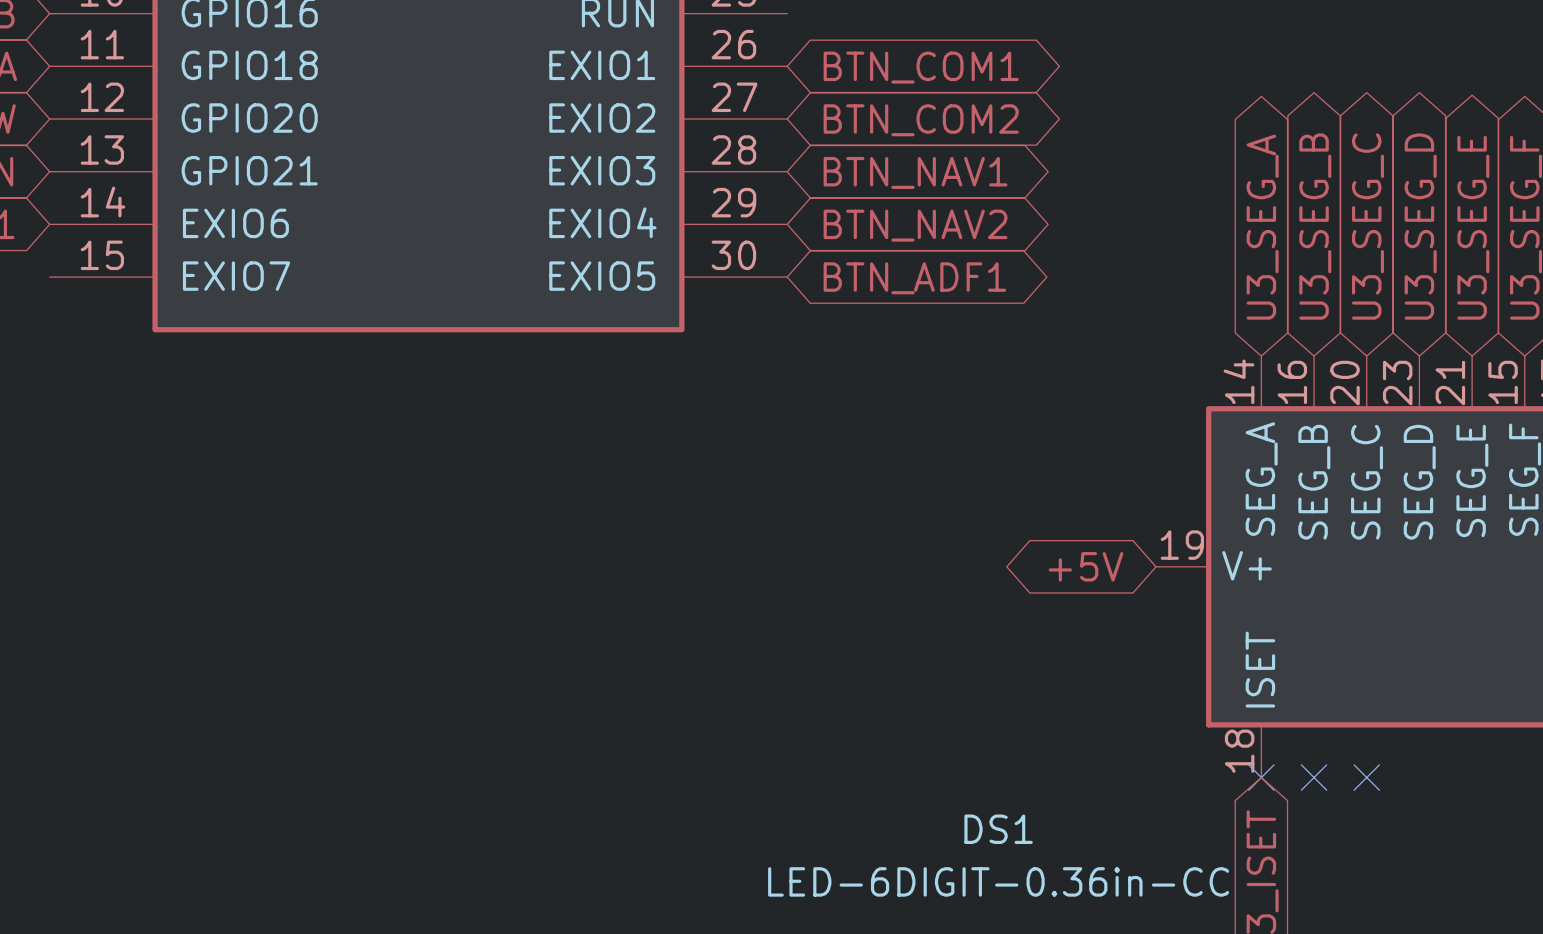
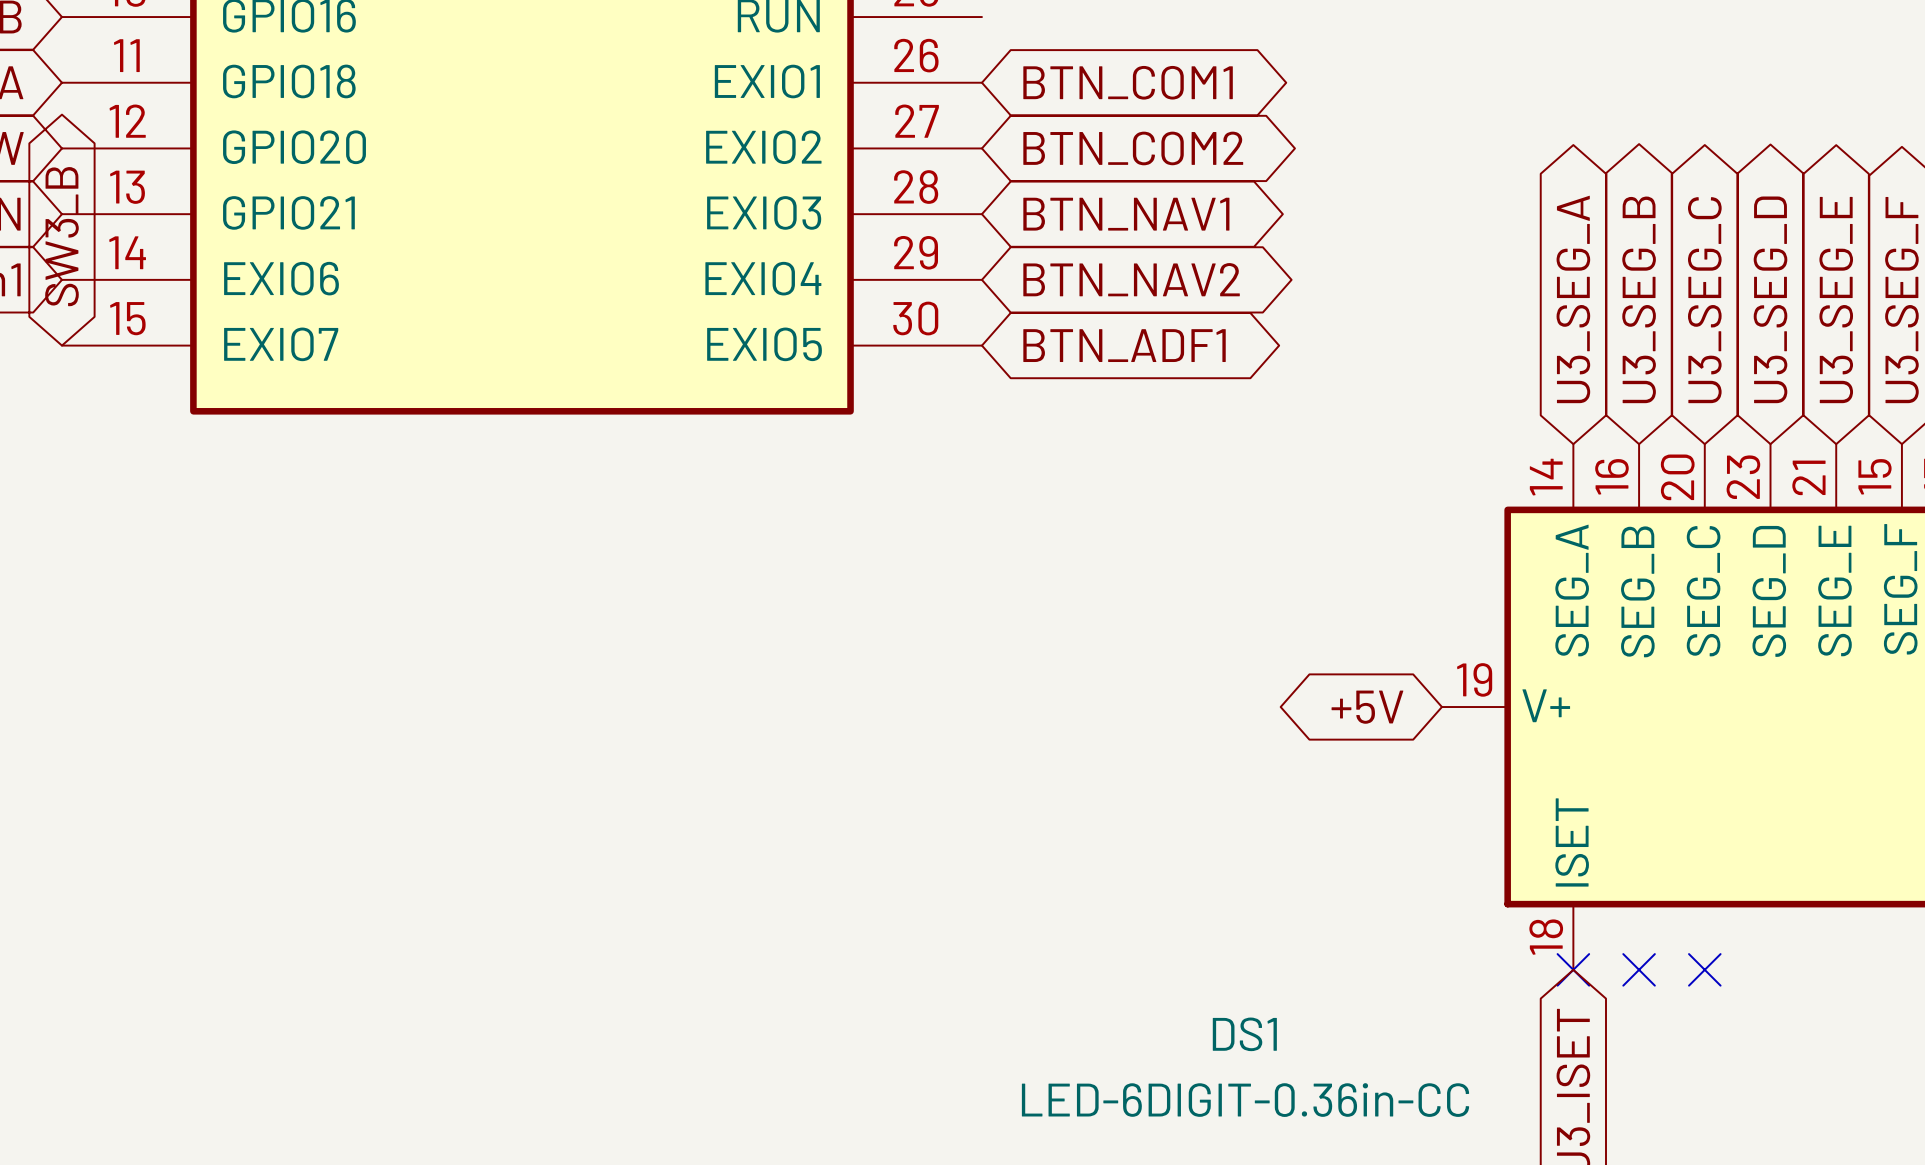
global label: none -> SW3_B (61, 236)

